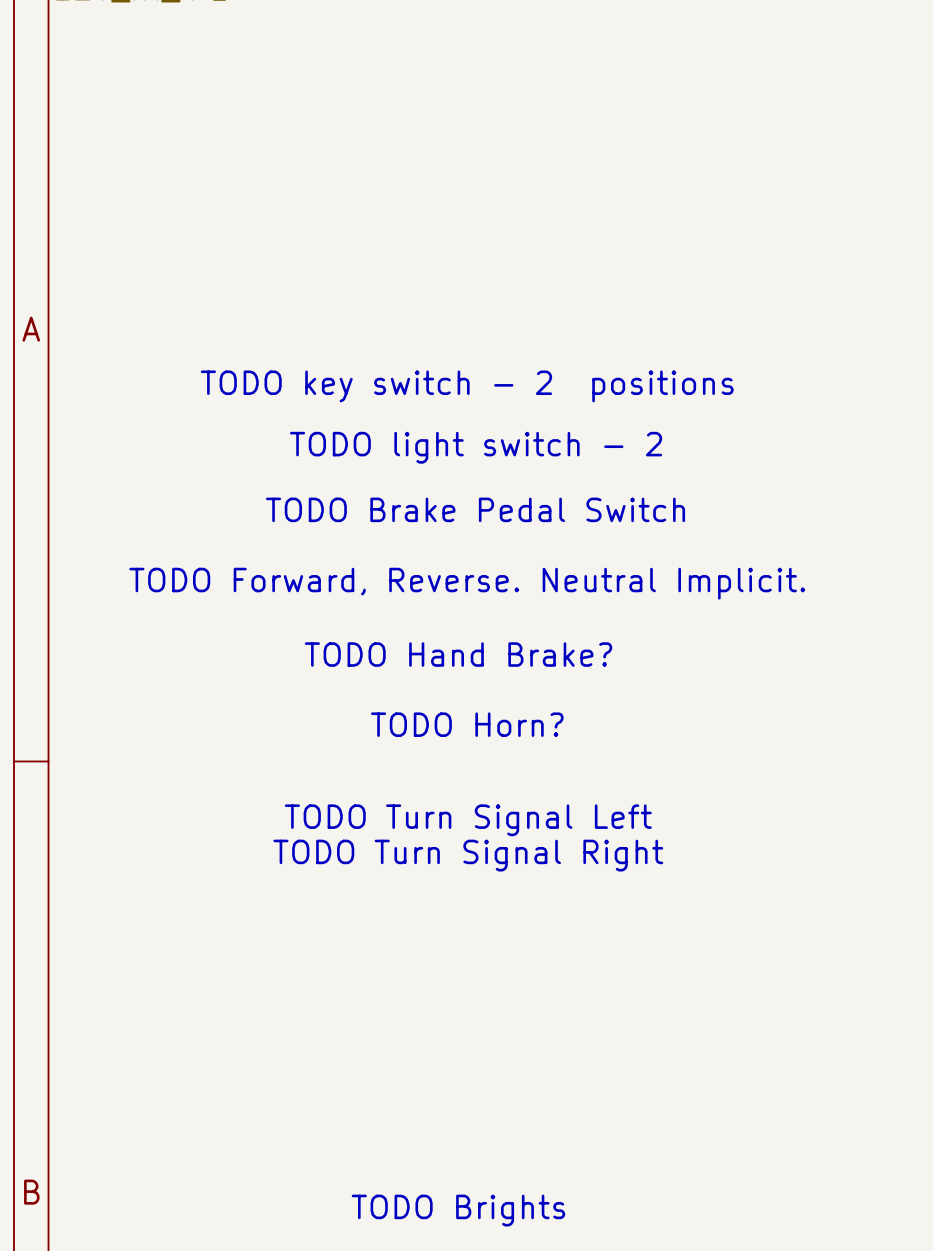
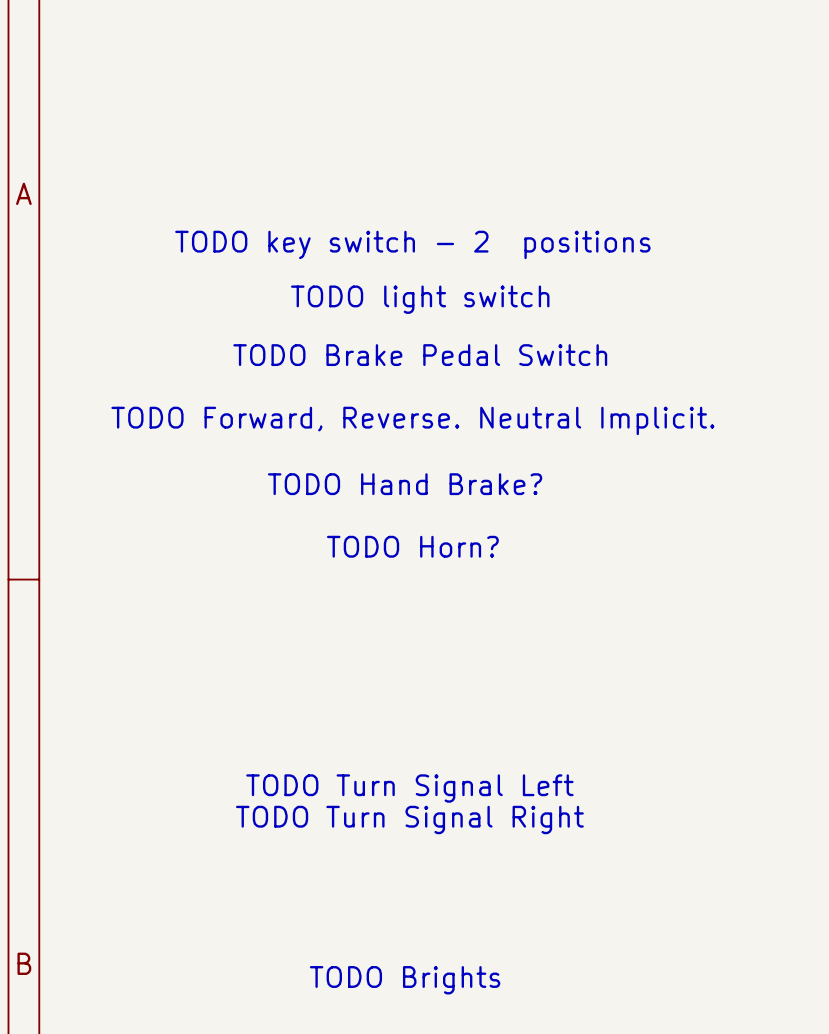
text: TODO light switch - 2 (476, 447) -> TODO light switch (420, 299)
text position: TODO Turn Signal Left (468, 820) -> TODO Turn Signal Left (409, 788)
text position: TODO Turn Signal Right (468, 855) -> TODO Turn Signal Right (409, 819)

